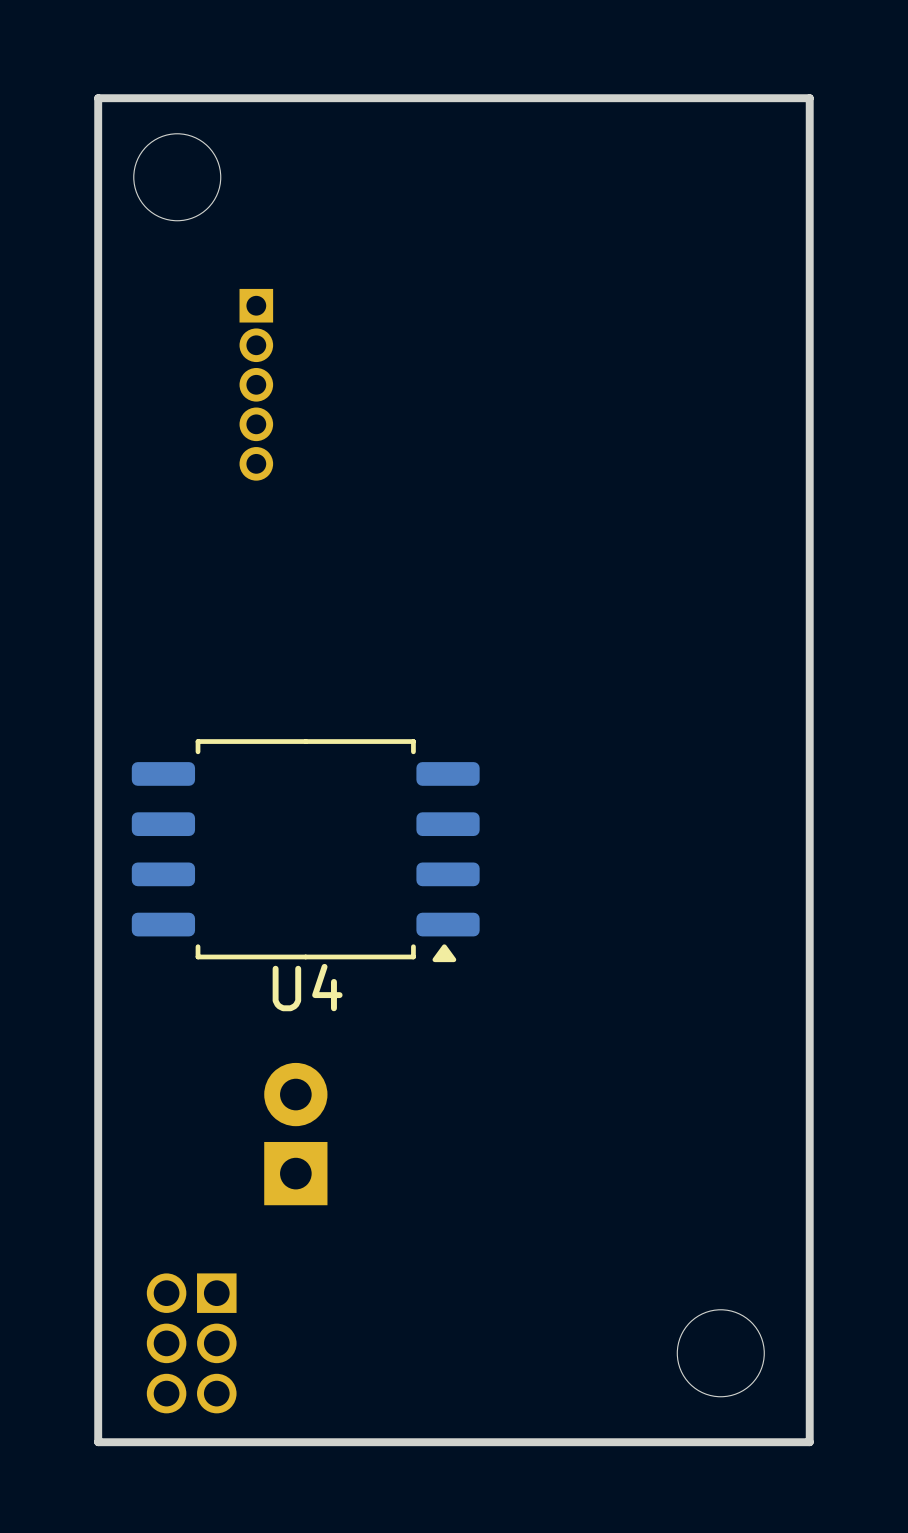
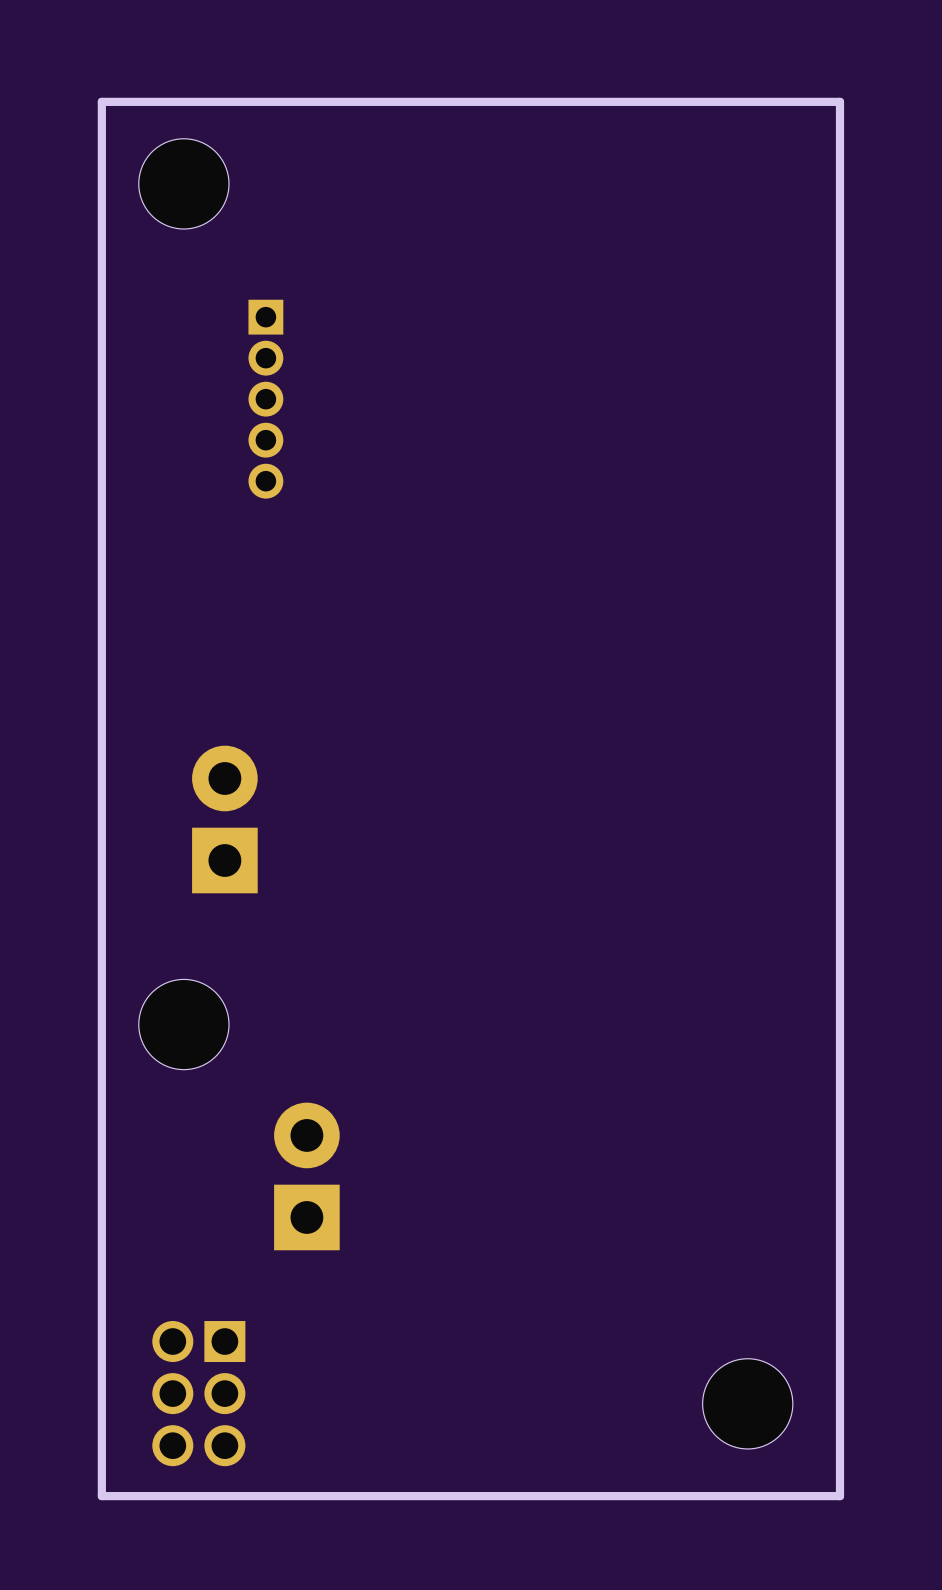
part: none -> (224, 819)
U4: (305, 850) -> none
part: none -> (183, 1024)

